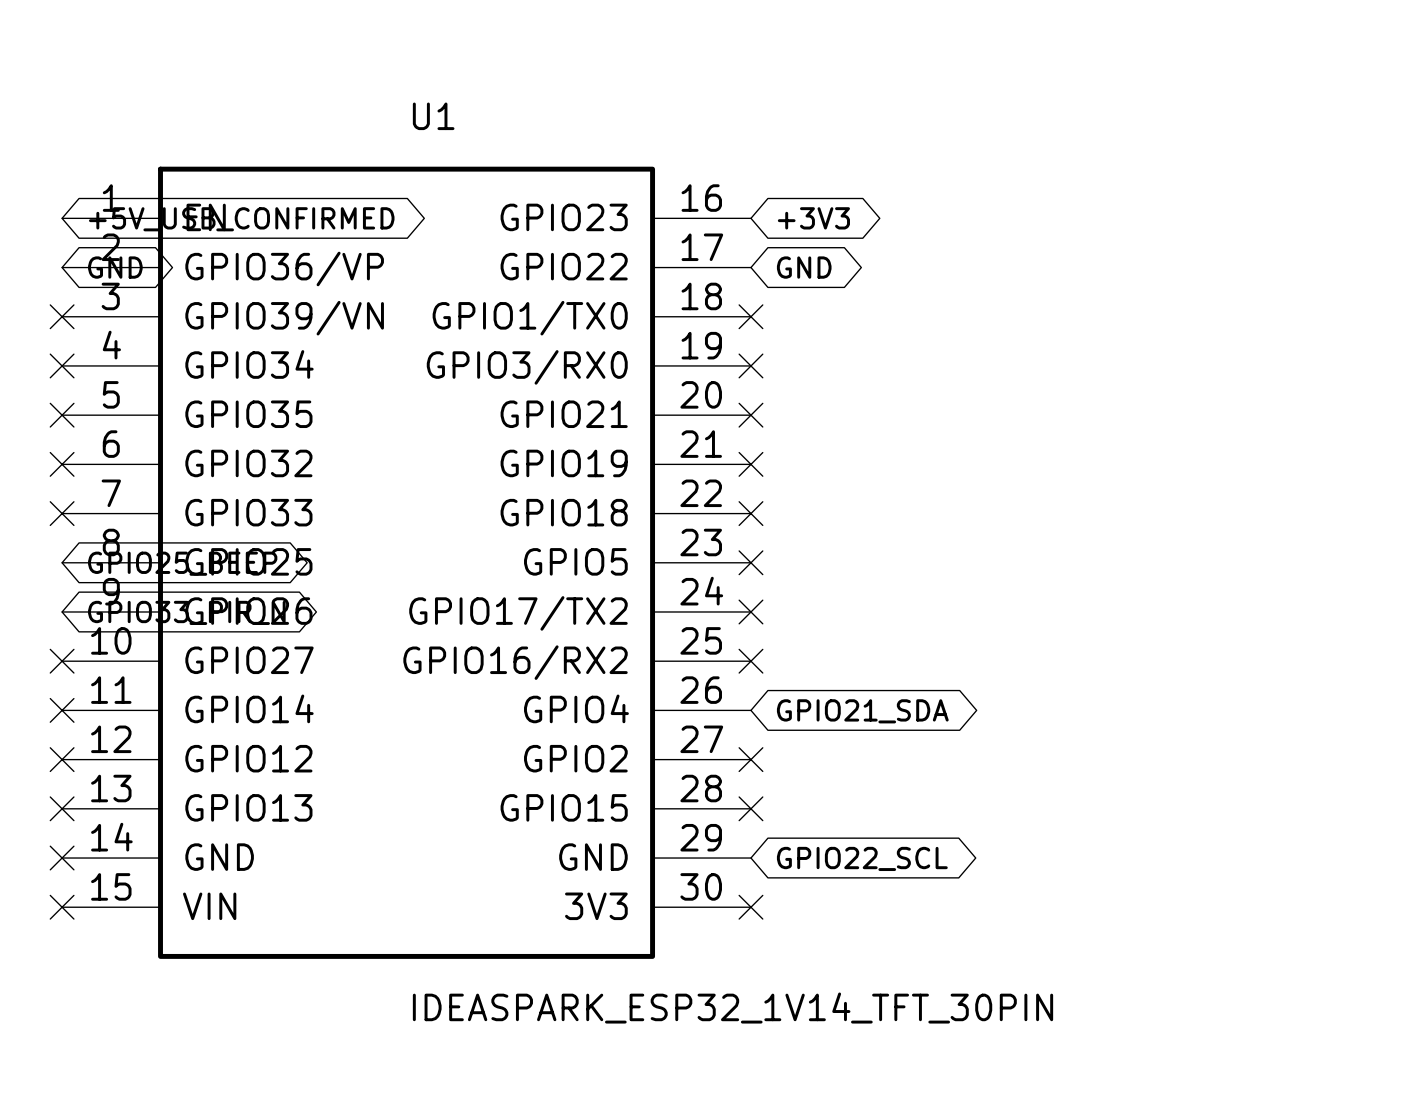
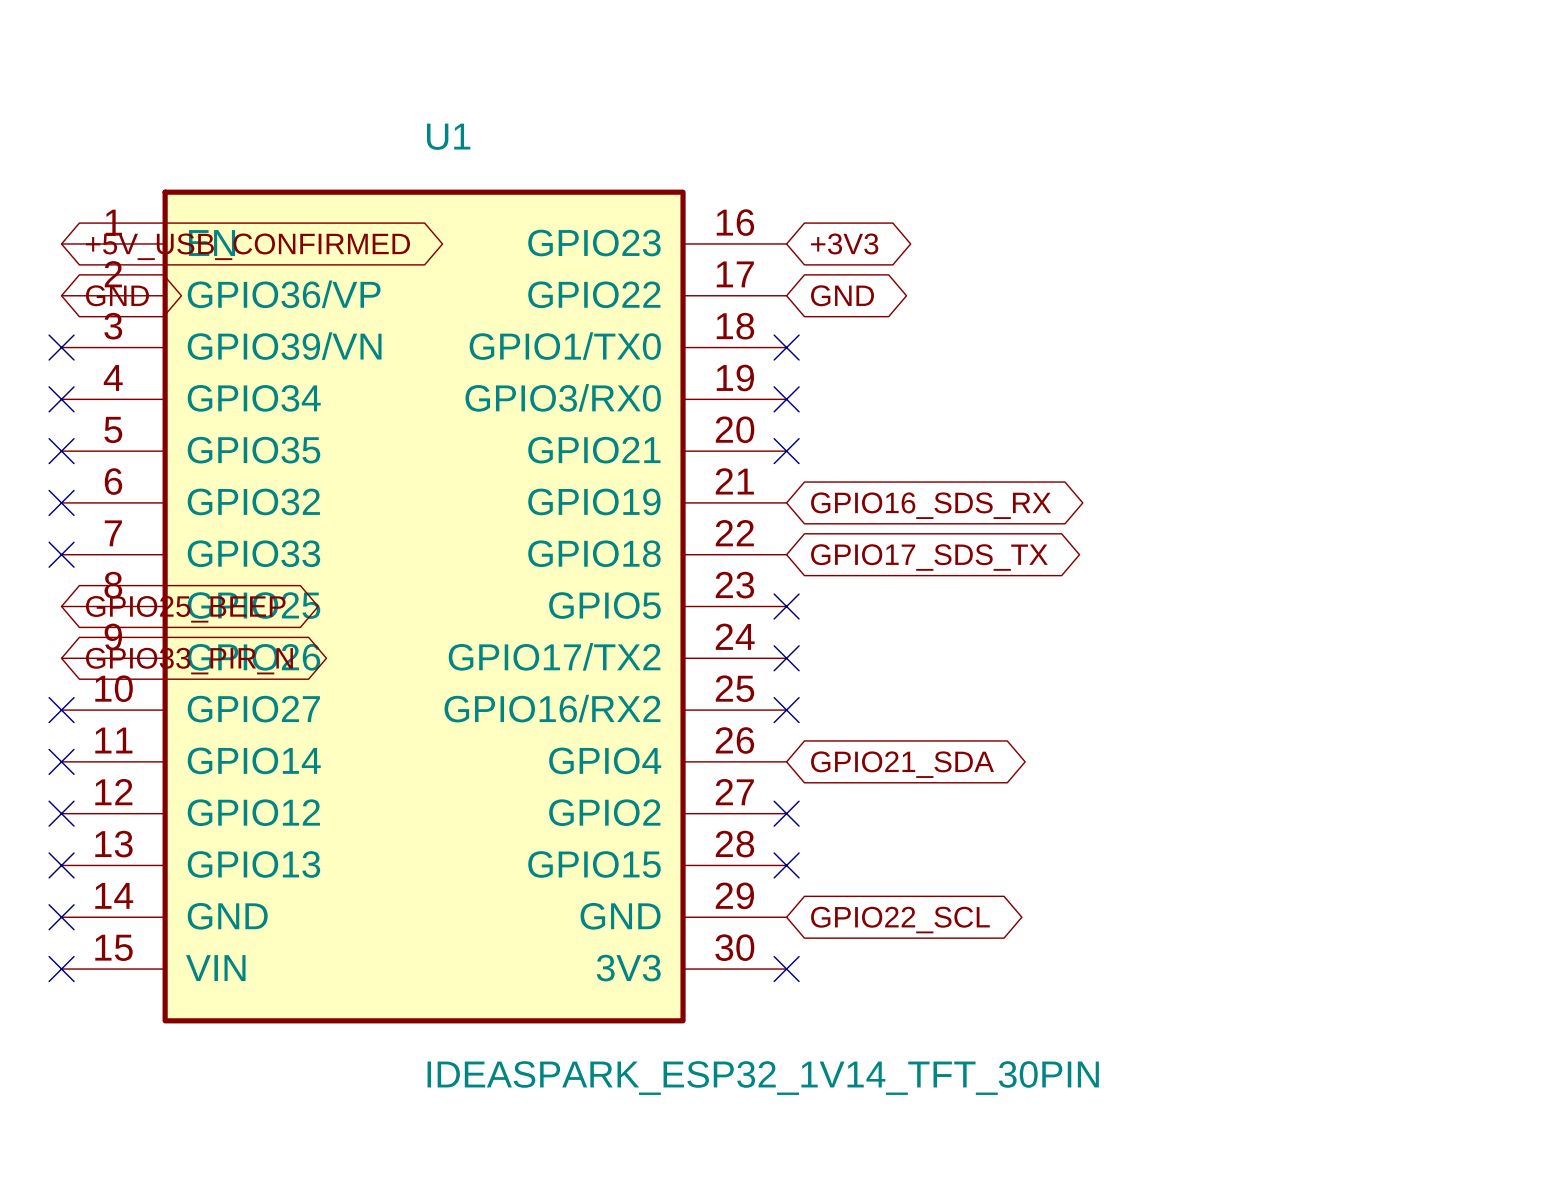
no-connect mark: (750, 464) -> none
global label: none -> GPIO16_SDS_RX (931, 505)
no-connect mark: (750, 513) -> none
global label: none -> GPIO17_SDS_TX (929, 557)

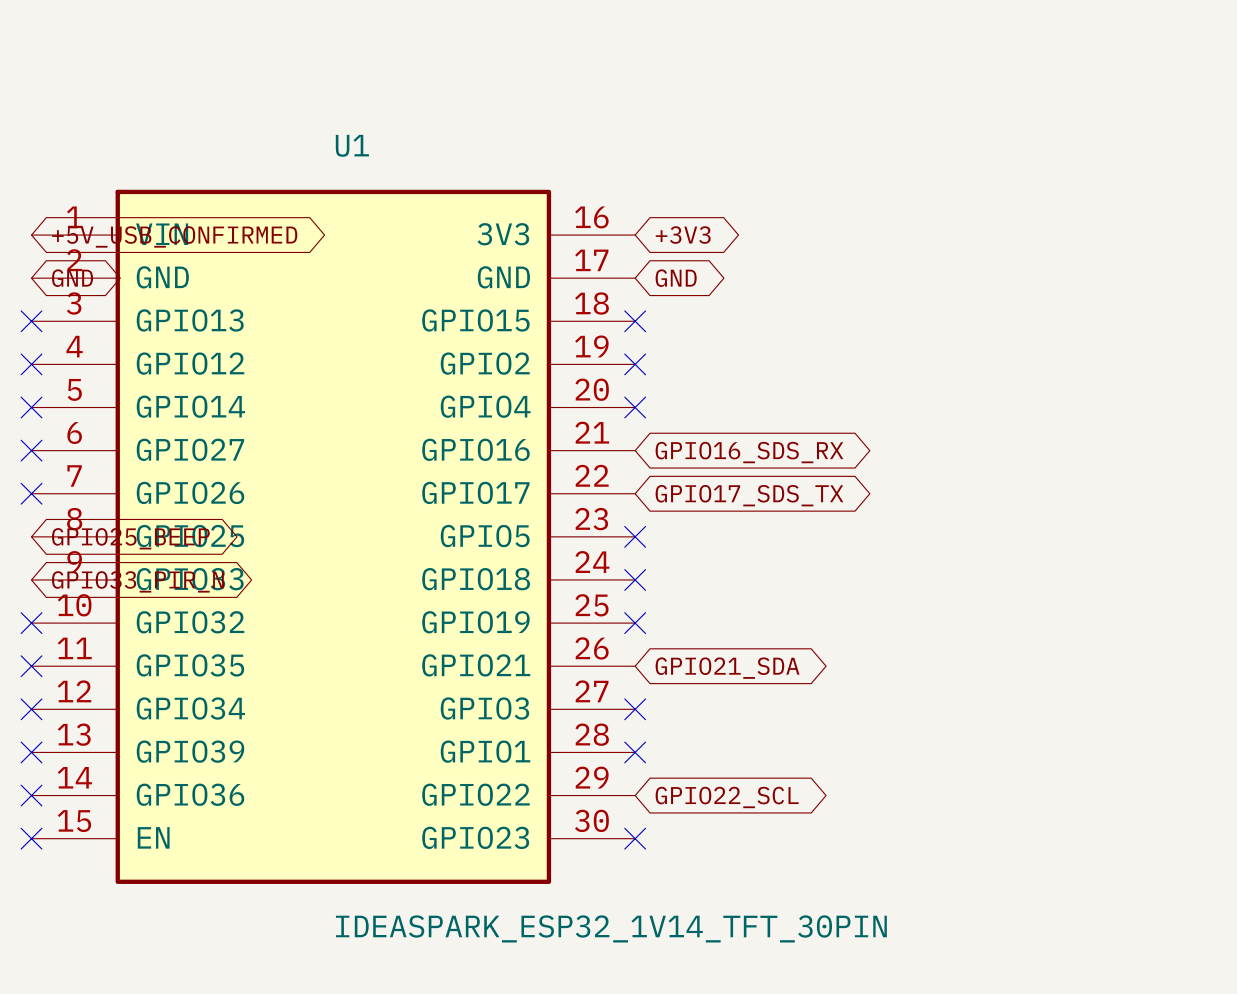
U1 symbol: [61, 189, 787, 1024] -> [31, 189, 636, 884]

